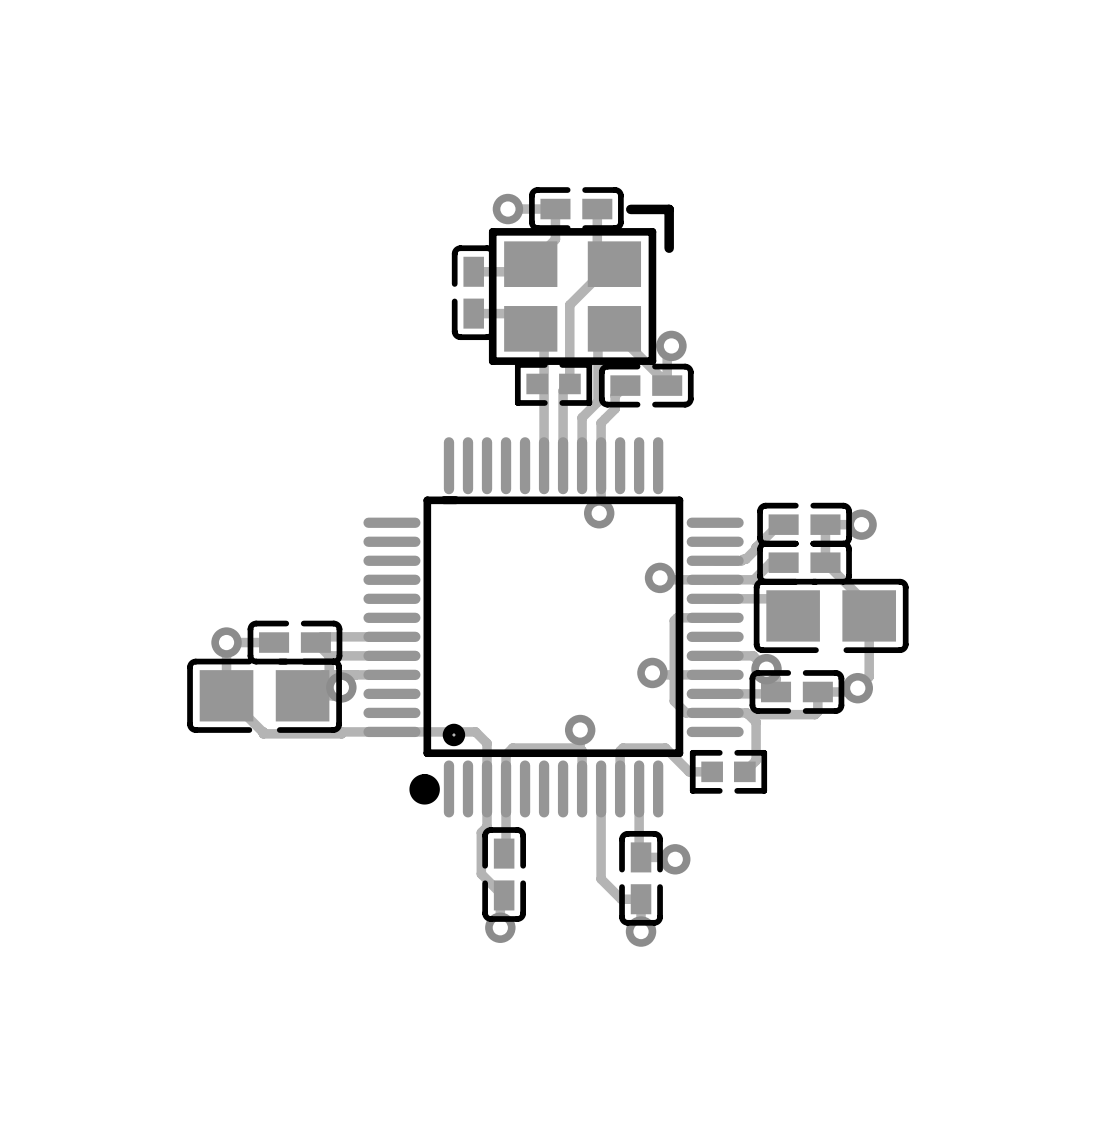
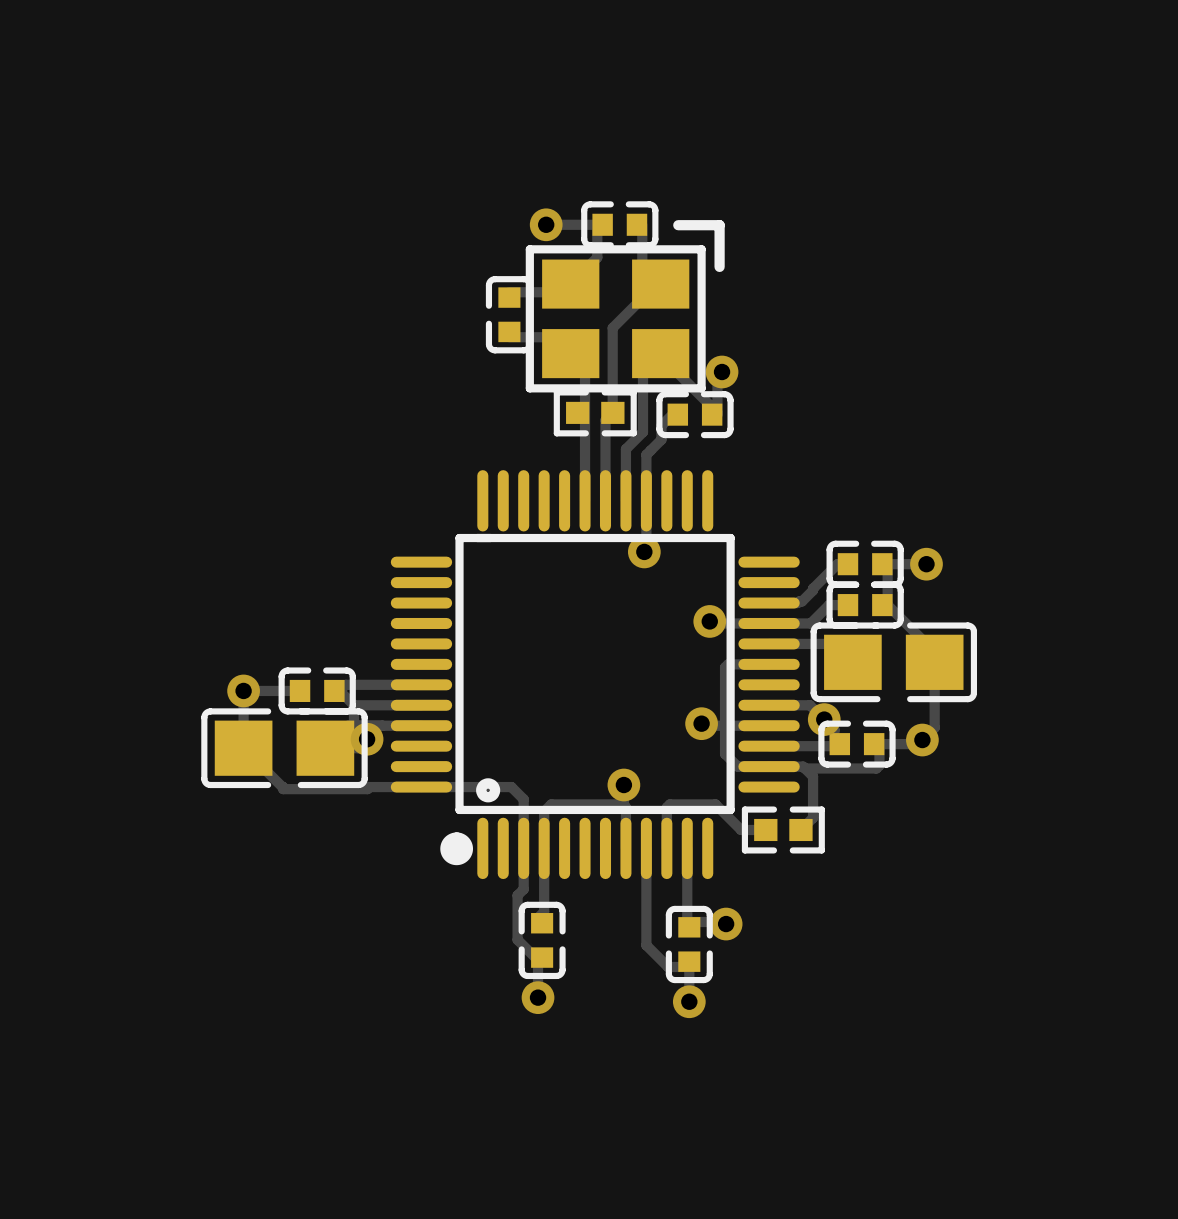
part footprint: [529, 187, 624, 231] -> [581, 201, 659, 249]
part footprint: [451, 245, 496, 341] -> [485, 276, 533, 354]
part footprint: [598, 363, 694, 408] -> [656, 391, 734, 439]
part footprint: [757, 502, 852, 547] -> [826, 540, 904, 588]
part footprint: [757, 540, 852, 585] -> [826, 581, 904, 629]
part footprint: [247, 620, 343, 665] -> [278, 667, 356, 715]
part footprint: [749, 670, 845, 714] -> [818, 720, 896, 768]
part footprint: [482, 827, 526, 922] -> [518, 901, 566, 980]
part footprint: [619, 830, 663, 926] -> [665, 905, 713, 984]

